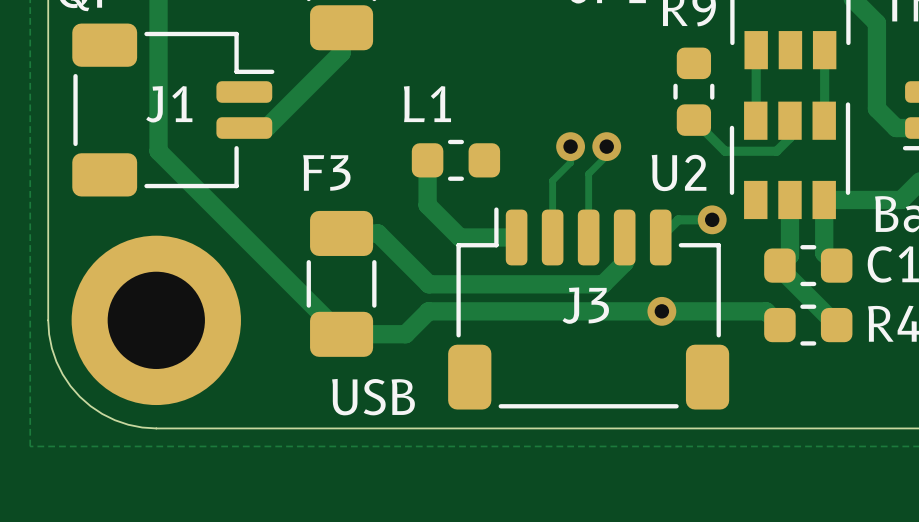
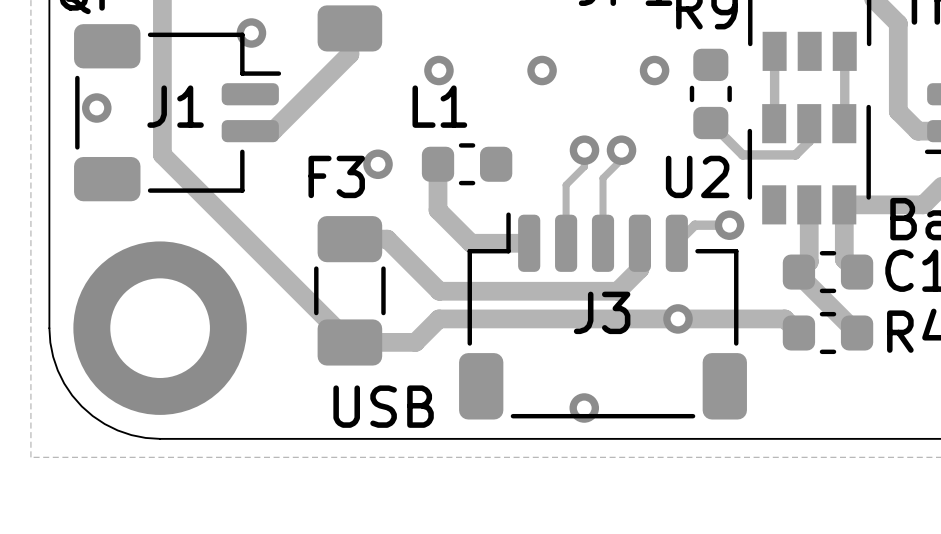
via: none -> (251, 33)
via: none -> (438, 70)
via: none -> (542, 70)
via: none -> (654, 70)
via: none -> (96, 108)
via: none -> (378, 164)
via: none -> (584, 408)

